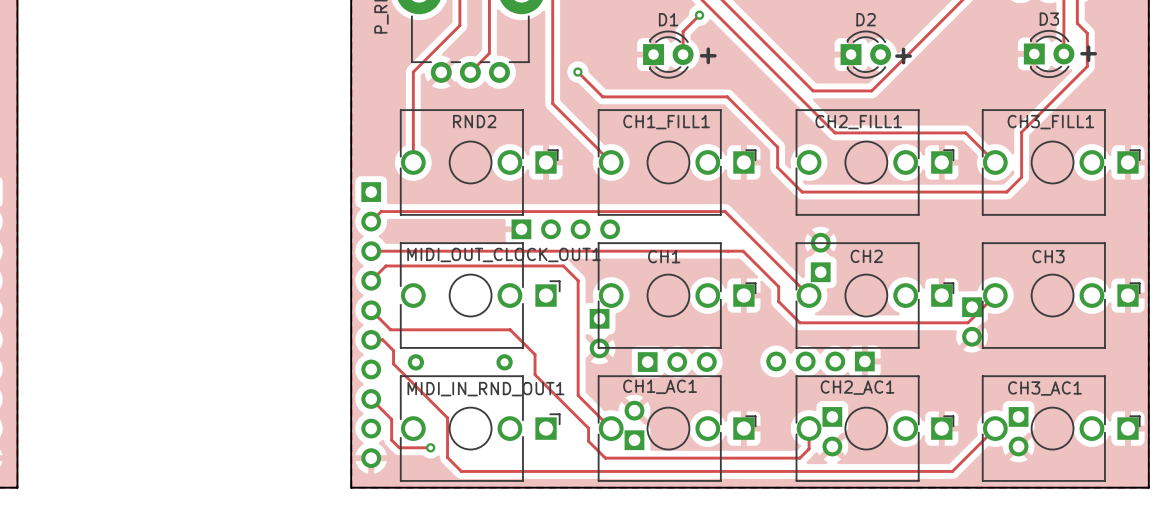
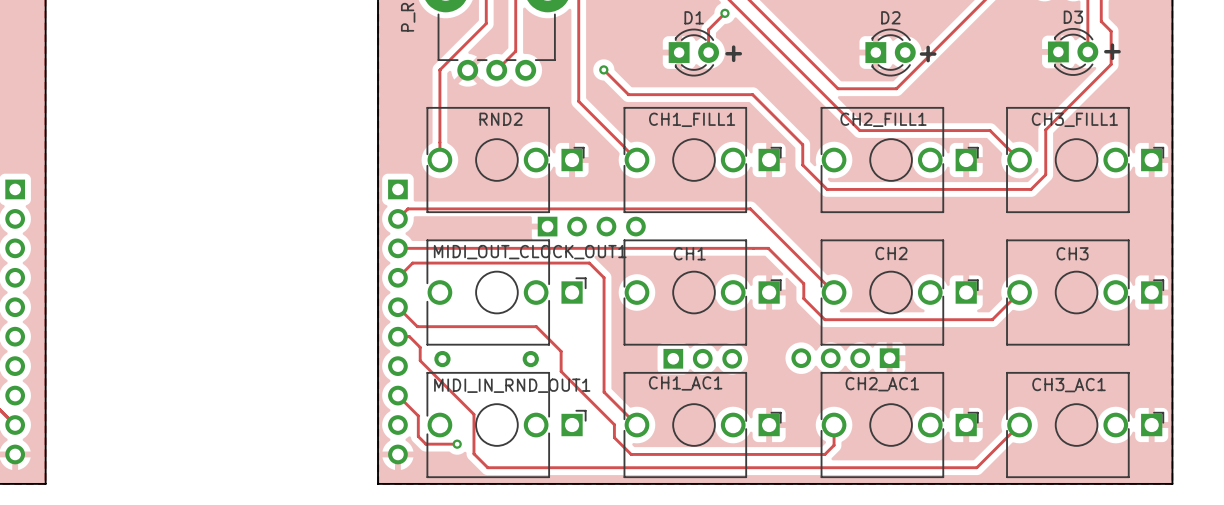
part: (820, 257) -> none
part: (972, 321) -> none
part: (599, 333) -> none
part: (634, 425) -> none
part: (832, 431) -> none
part: (1018, 431) -> none

